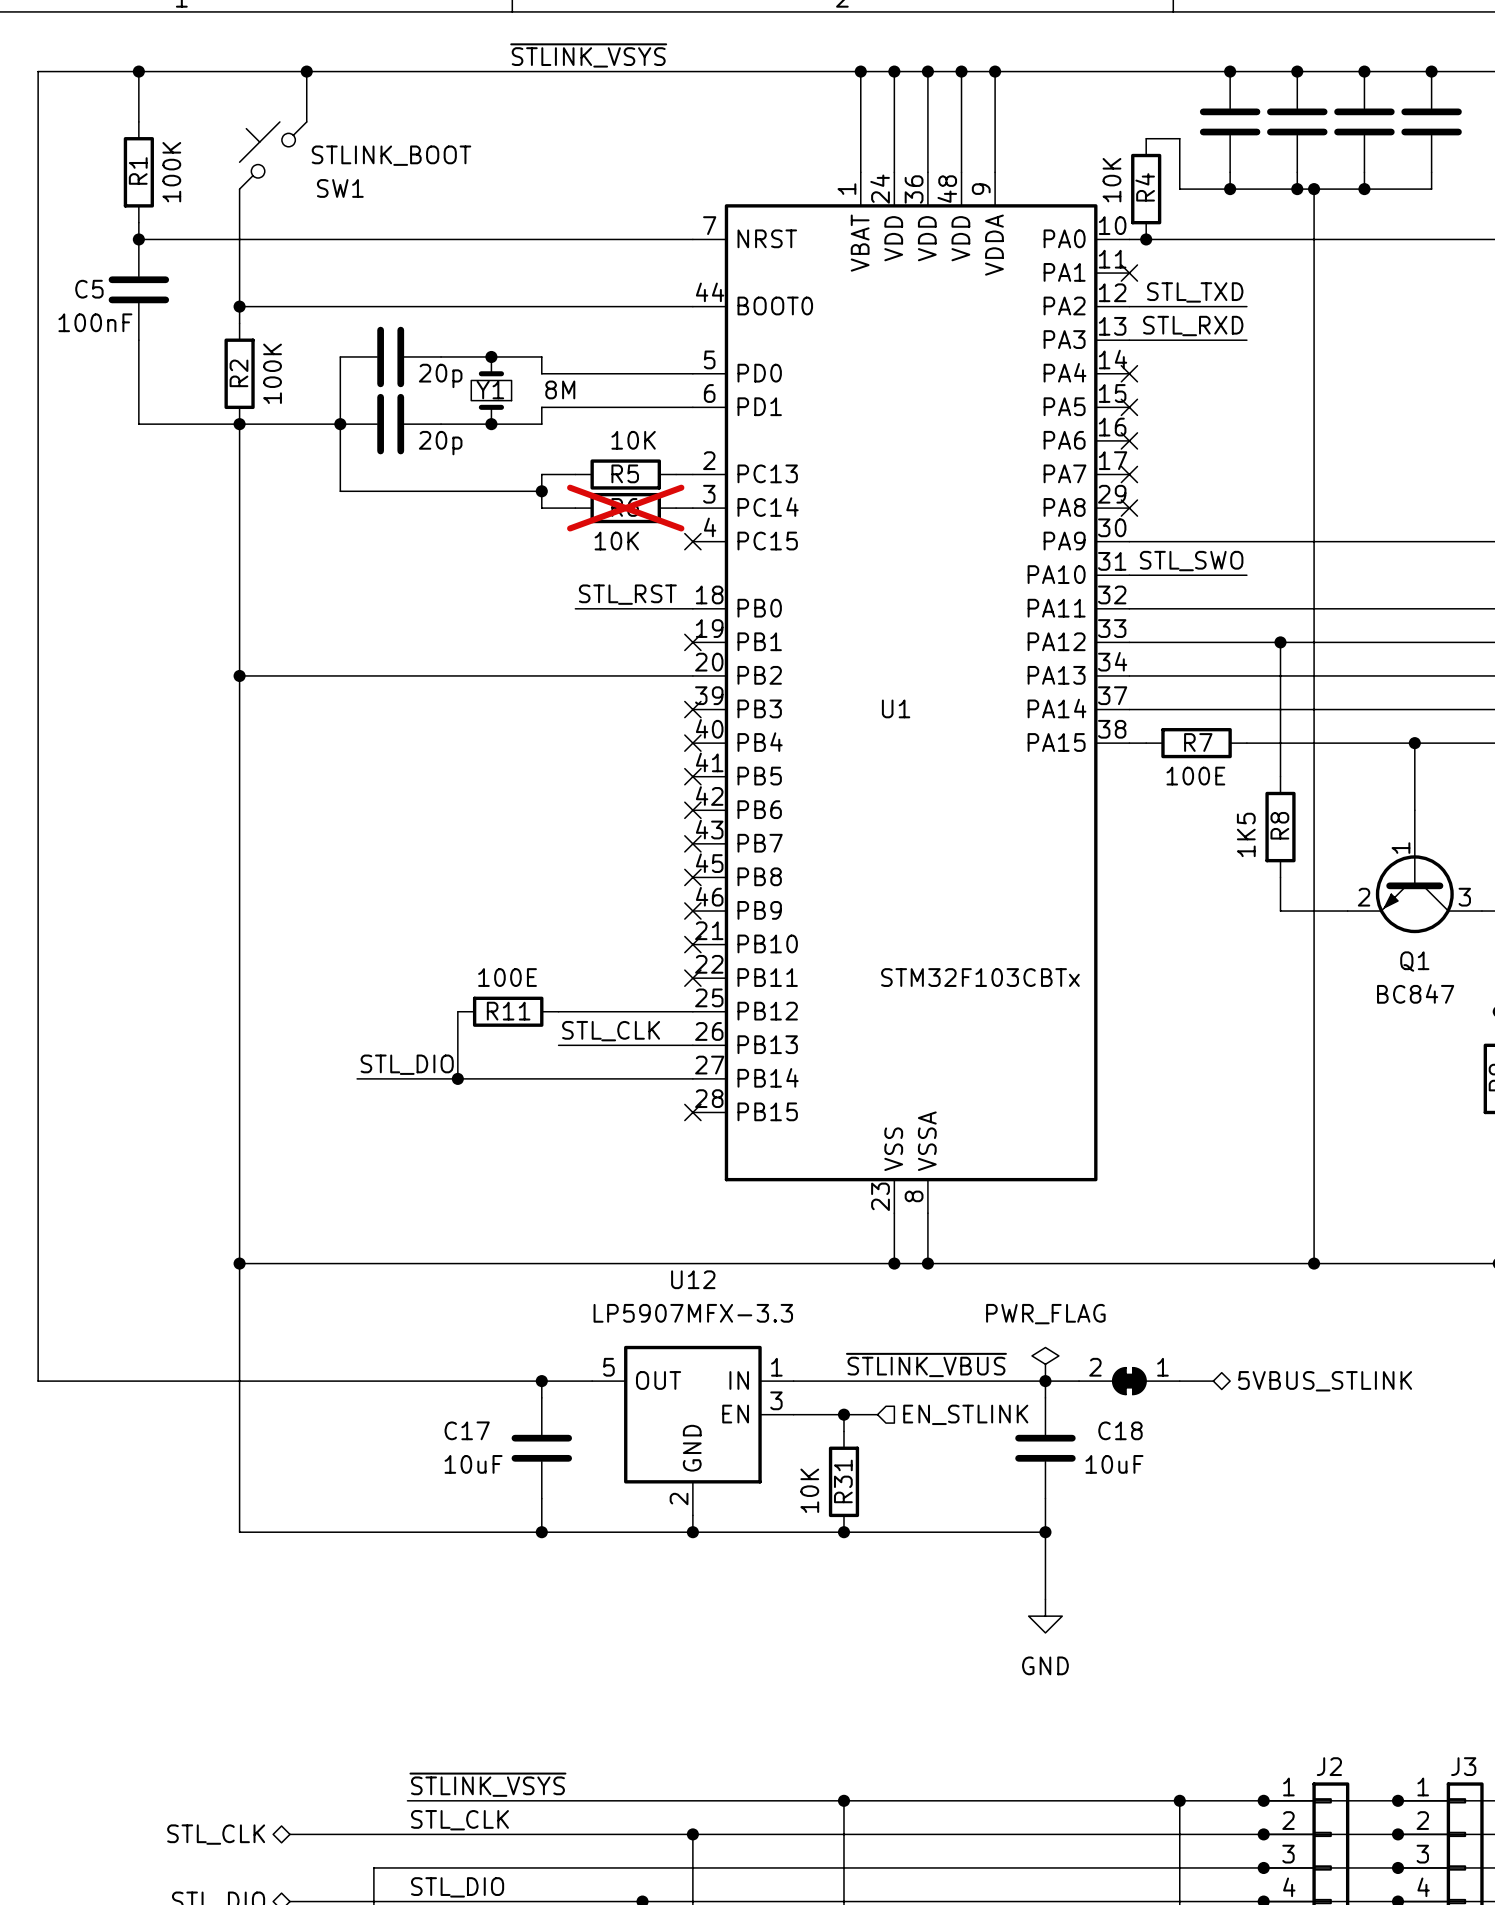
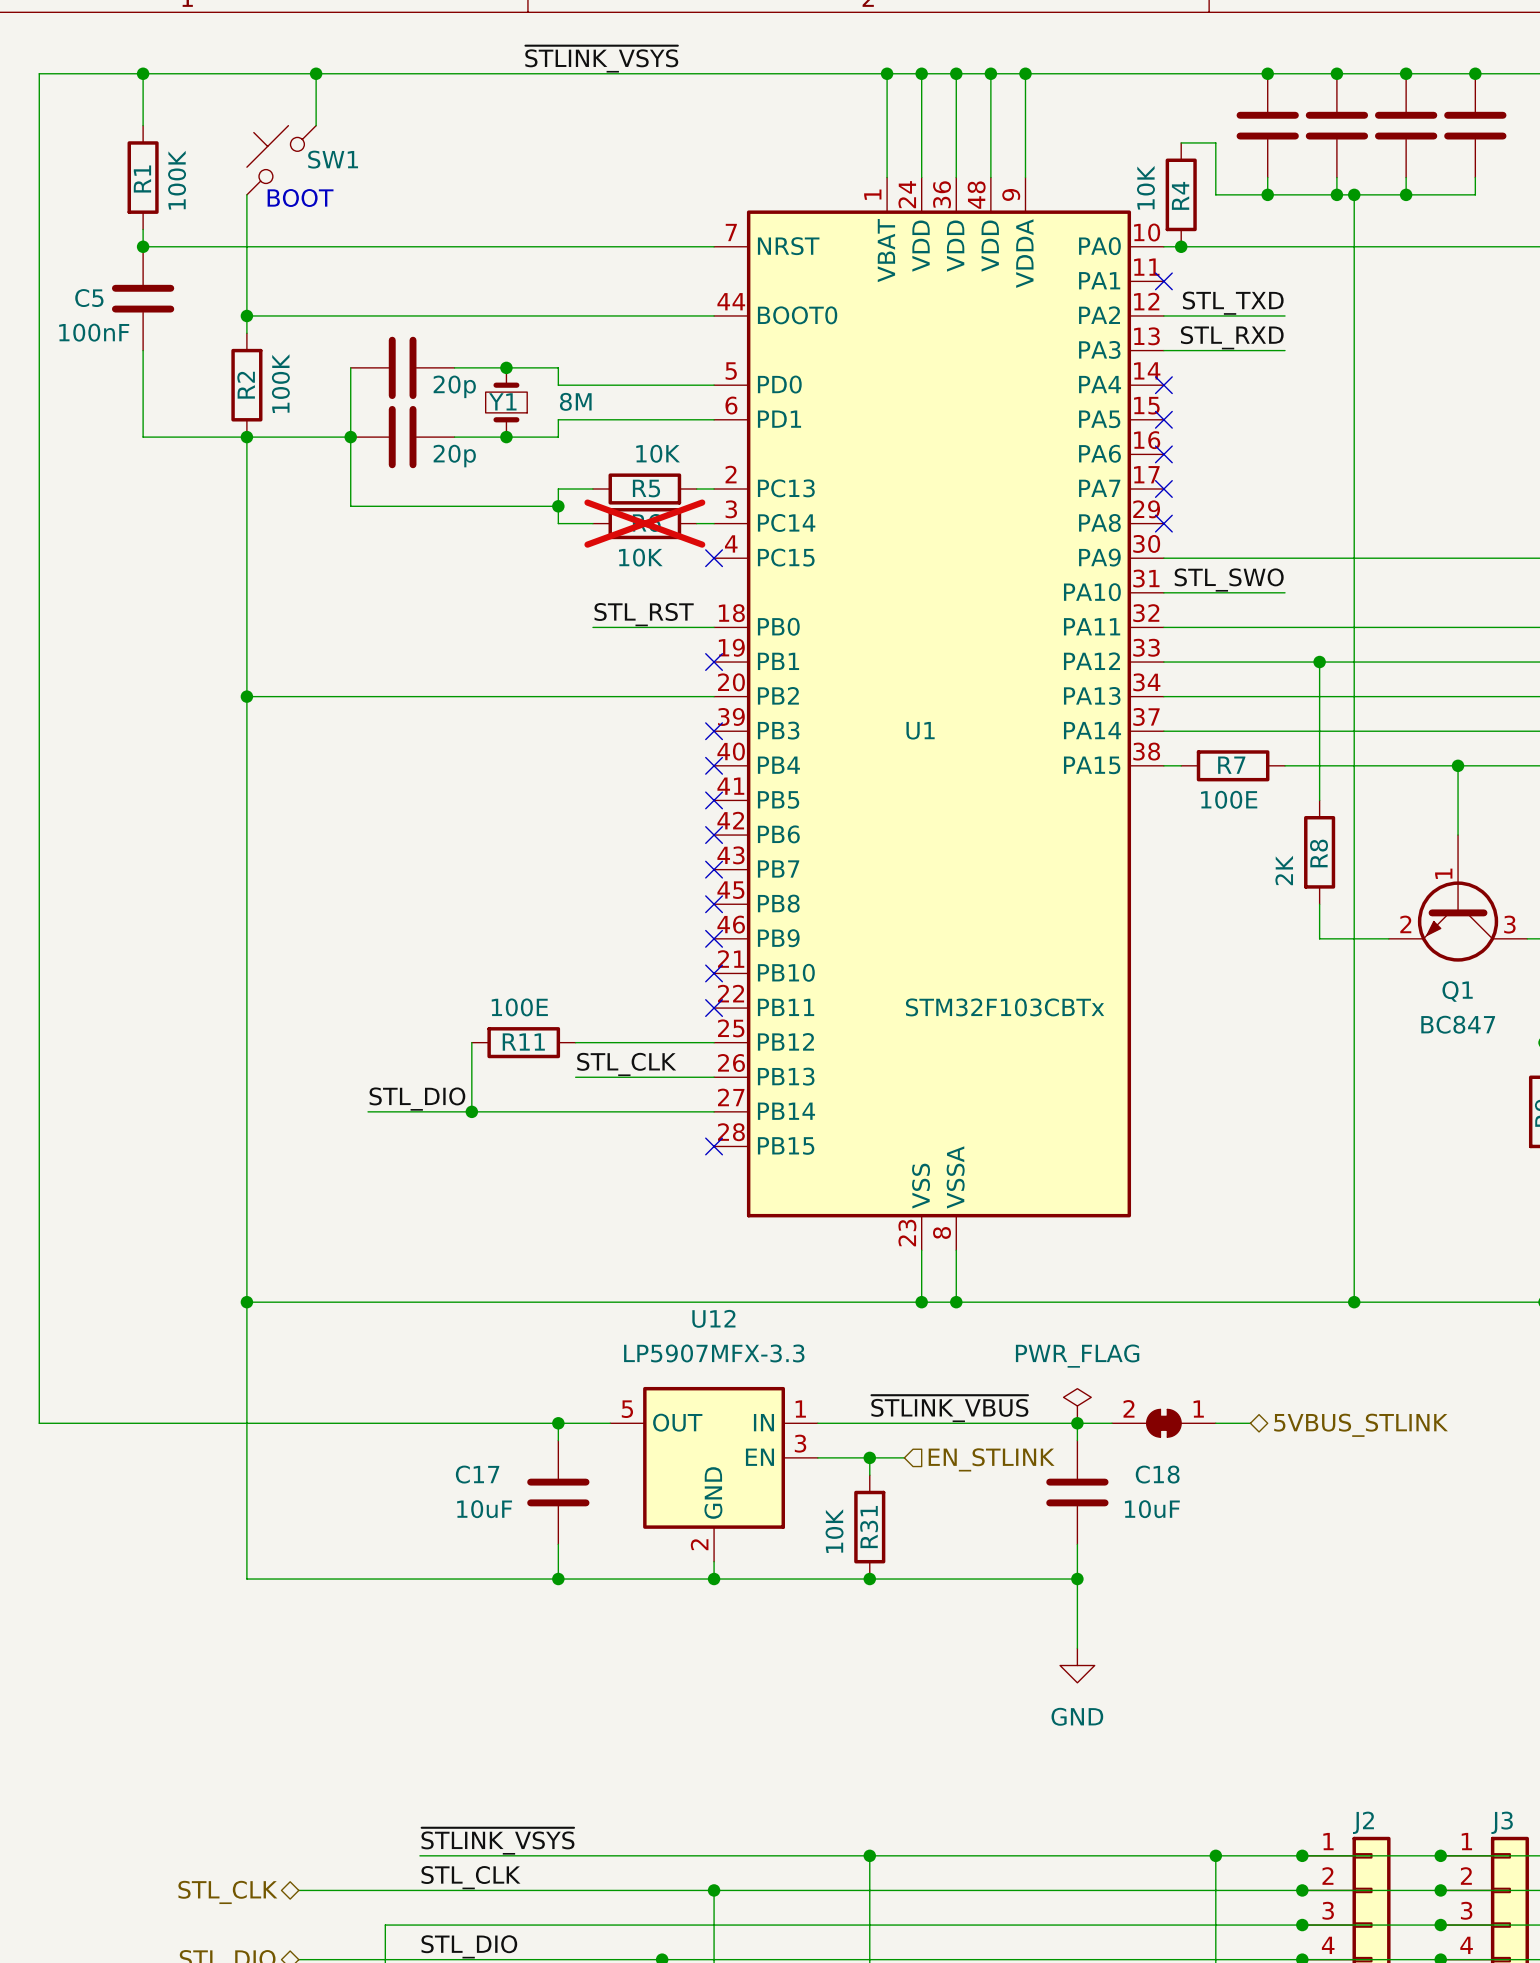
SW1 value: STLINK_BOOT (391, 155) -> none
SW1 name position: SW1 (340, 188) -> SW1 (333, 159)
text: none -> BOOT (300, 198)
R8 value: 1K5 (1246, 834) -> 2K (1284, 870)

